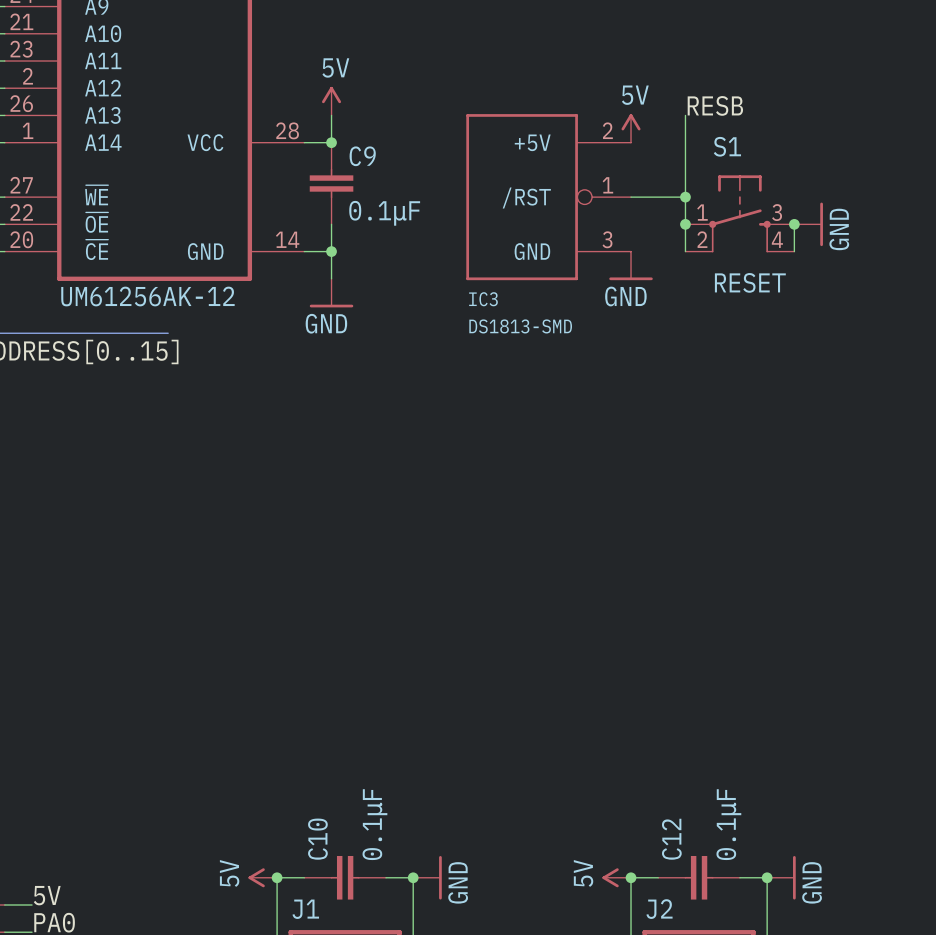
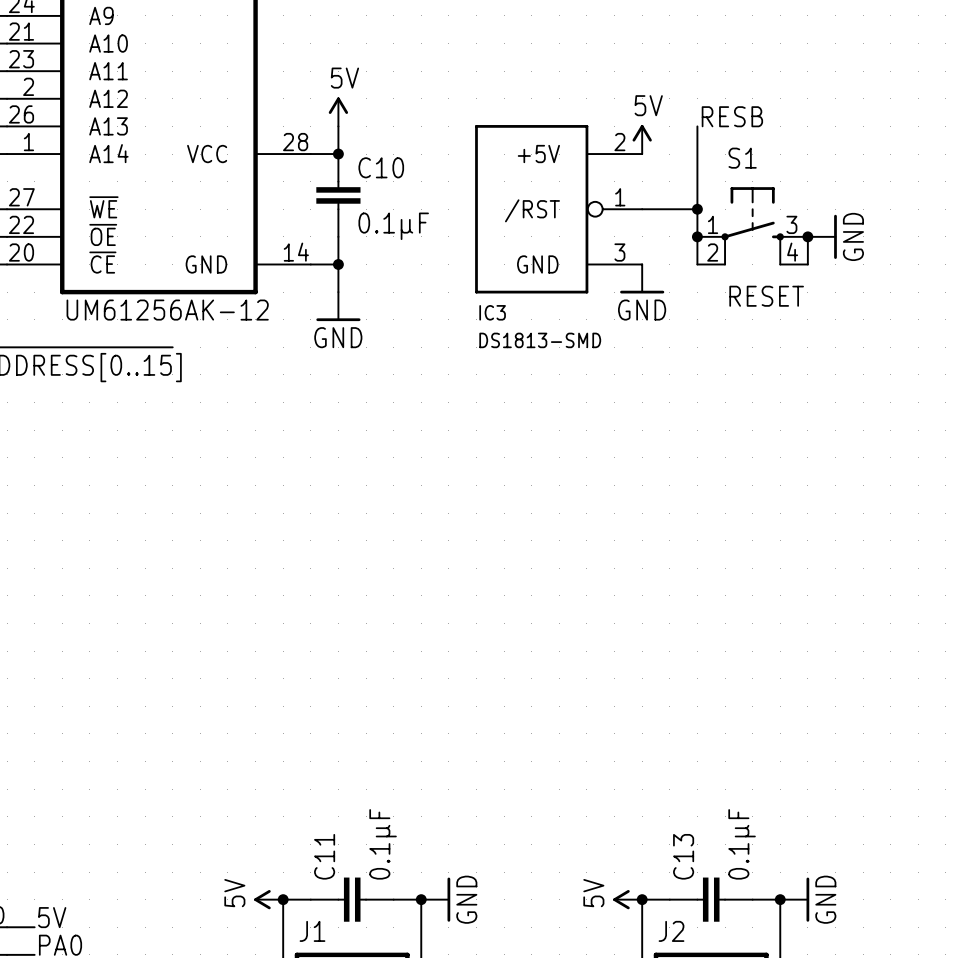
C9 name: C9 (362, 156) -> C10 (381, 167)
C10 name: C10 (317, 839) -> C11 (324, 856)
C12 name: C12 (671, 839) -> C13 (683, 856)

